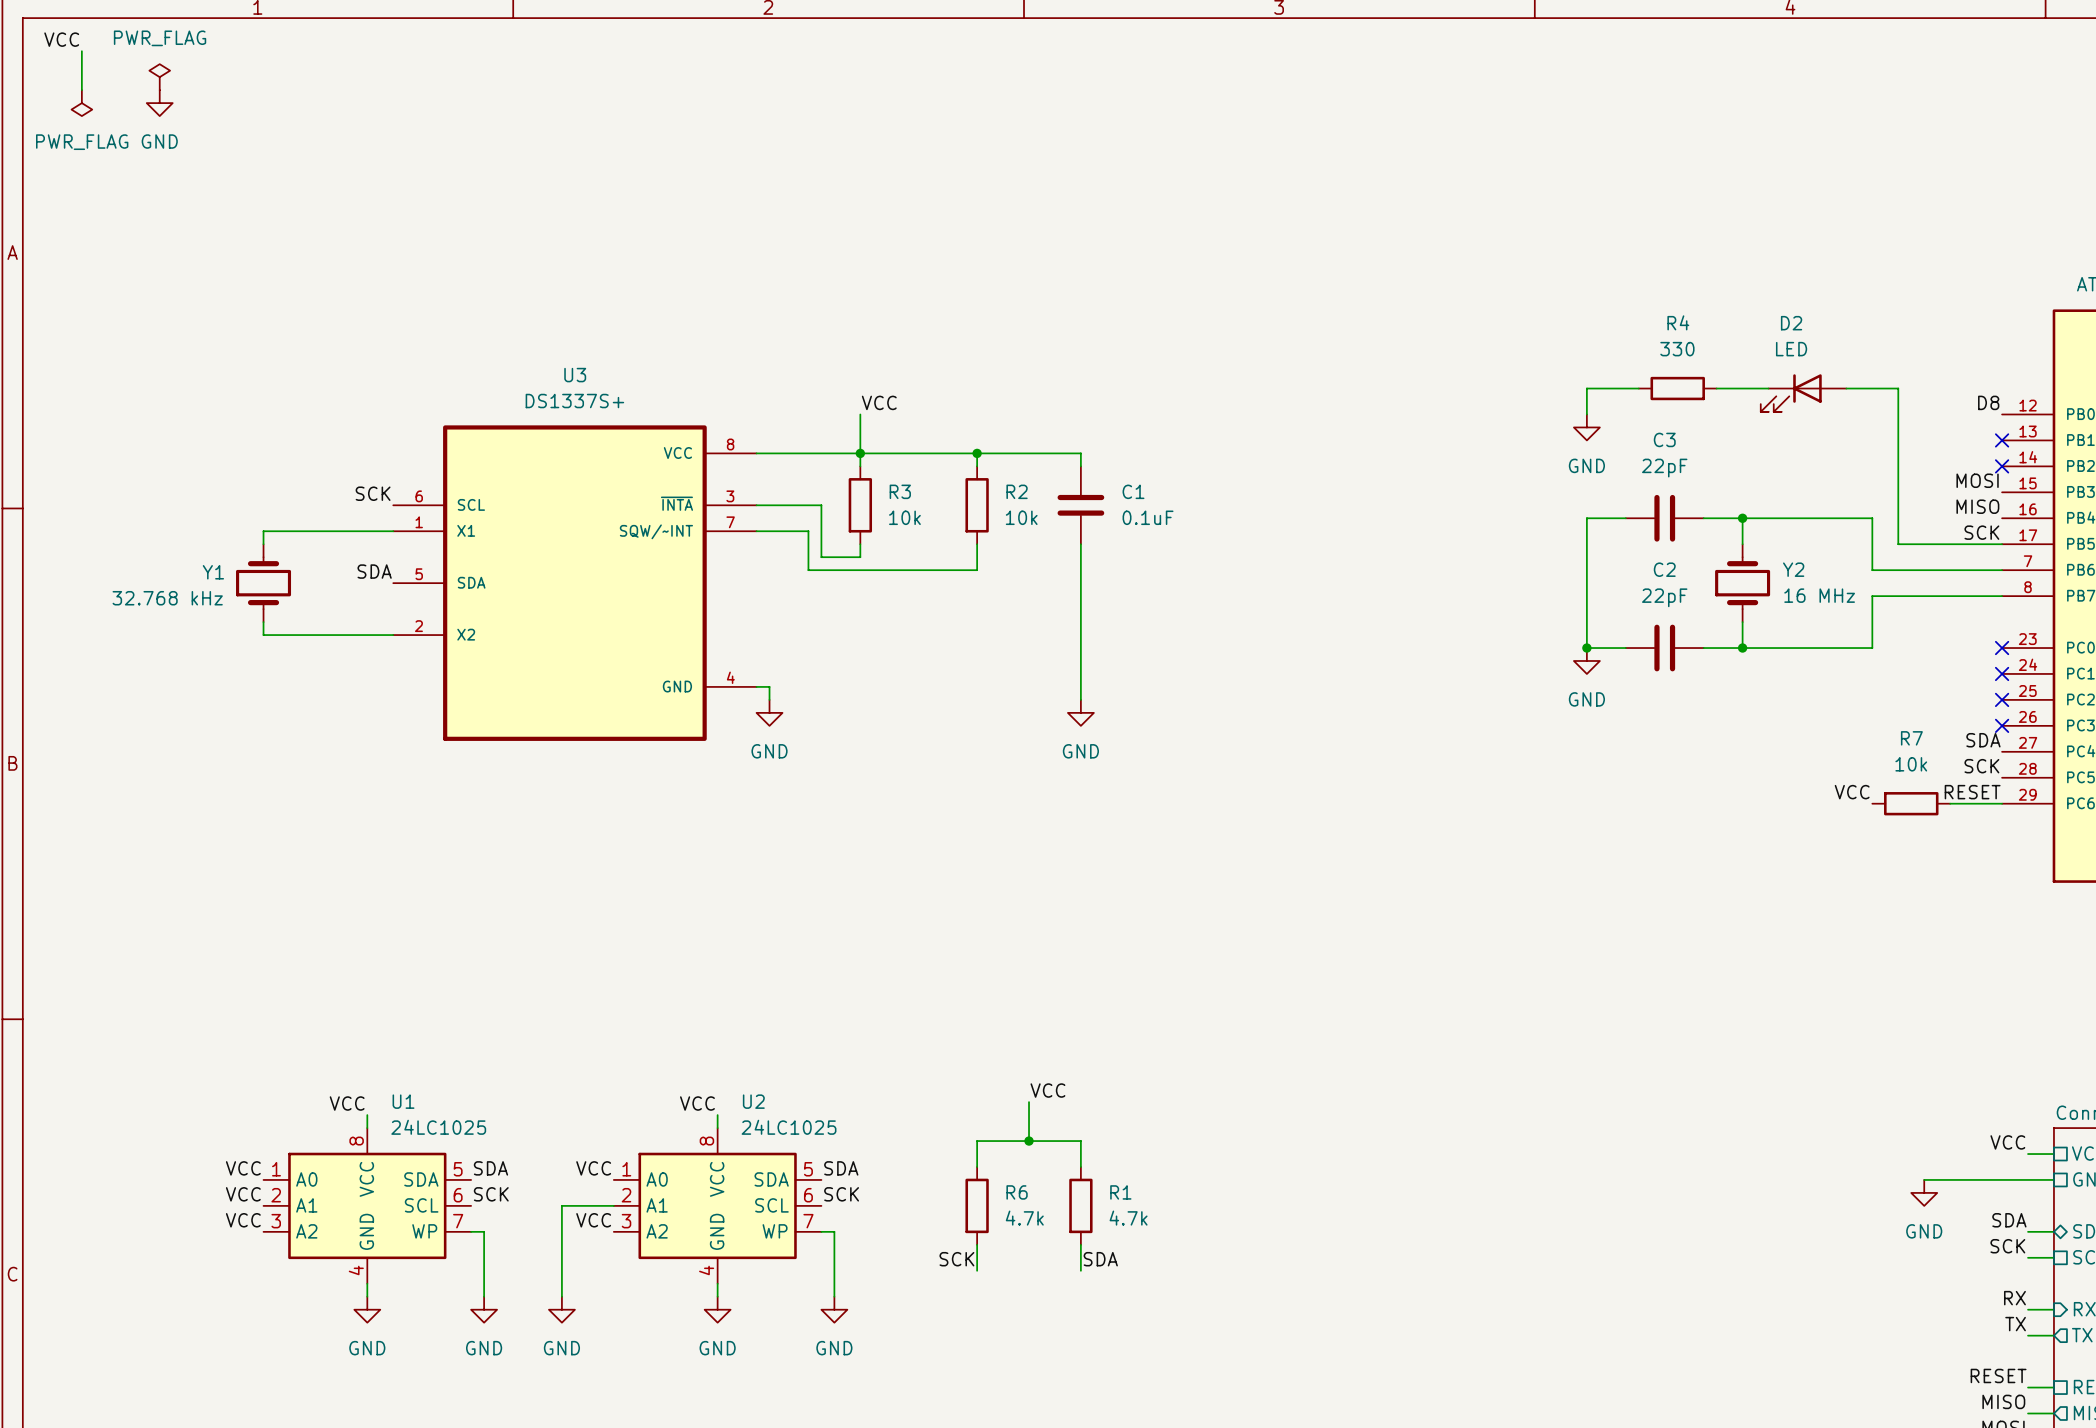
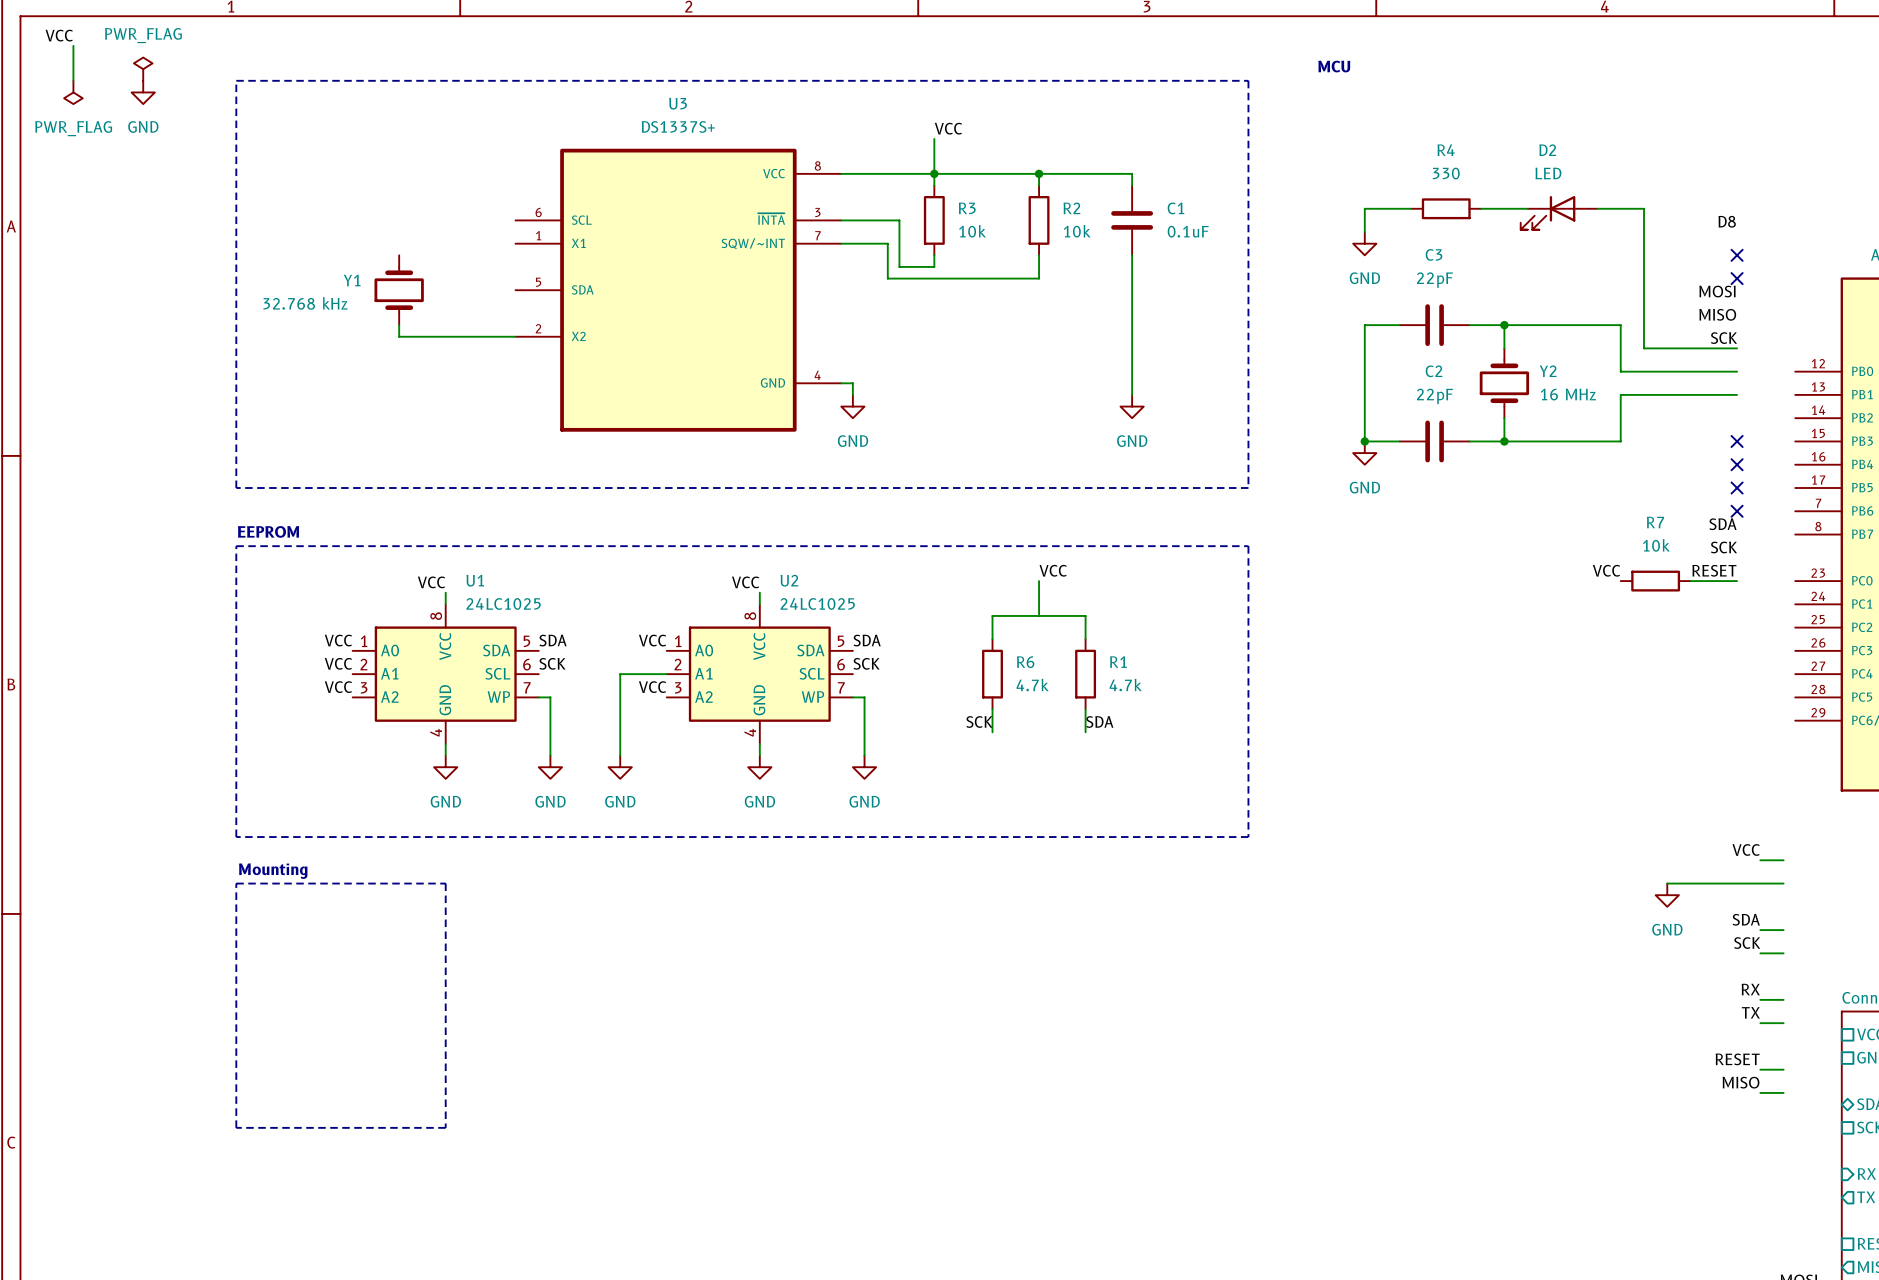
text: none -> MCU (1334, 66)
line: none -> (236, 80) (236, 488) (1248, 488) (1248, 80) (236, 80)
label: none -> VCC (948, 128)
wire: none -> (934, 138) (934, 185)
wire: none -> (841, 173) (1132, 173) (1132, 185)
junction: none -> (934, 173)
wire: none -> (1039, 173) (1039, 185)
junction: none -> (1039, 173)
wire: none -> (1597, 208) (1644, 208) (1644, 348) (1655, 348)
wire: none -> (841, 220) (899, 220) (899, 266) (934, 266) (934, 255)
wire: none -> (841, 243) (887, 243) (887, 278) (1039, 278) (1039, 255)
power symbol: none -> GND (1364, 243)
wire: none -> (1132, 255) (1132, 394)
no-connect mark: none -> (1737, 255)
no-connect mark: none -> (1737, 278)
wire: none -> (399, 325) (399, 336) (515, 336)
junction: none -> (1504, 325)
label: none -> SCK (1723, 338)
wire: (1638, 388) (1586, 388) (1586, 414) -> (1411, 208) (1364, 208) (1364, 232)
R4 position: (1677, 388) -> (1446, 208)
wire: (1716, 388) (1768, 388) -> (1481, 208) (1527, 208)
wire: (1898, 388) (1898, 544) (2002, 544) -> (1702, 348) (1737, 348)
D2 position: (1803, 393) -> (1559, 212)
label: VCC (879, 402) -> none
label position: D8 (1988, 402) -> D8 (1727, 221)
wire: none -> (841, 383) (852, 383) (852, 394)
power symbol: GND (1586, 427) -> none
no-connect mark: (2002, 440) -> none
wire: (756, 453) (1080, 453) (1080, 466) -> none
junction: (860, 453) -> none
power symbol: none -> GND (852, 406)
wire: (977, 453) (977, 466) -> (759, 592) (759, 604)
junction: (977, 453) -> none
power symbol: none -> GND (1132, 406)
no-connect mark: (2002, 466) -> none
label position: MOSI (1977, 480) -> MOSI (1717, 291)
junction: none -> (1364, 441)
junction: none -> (1504, 441)
no-connect mark: none -> (1737, 441)
label: SCK (373, 493) -> none
wire: (756, 505) (821, 505) (821, 557) (860, 557) (860, 544) -> none
R3 position: (860, 505) -> (934, 220)
R2 position: (977, 505) -> (1039, 220)
C1 position: (1080, 505) -> (1132, 220)
power symbol: none -> GND (1364, 453)
label position: MISO (1977, 506) -> MISO (1717, 314)
wire: (1625, 518) (1586, 518) (1586, 648) (1625, 648) -> (1399, 325) (1364, 325) (1364, 441) (1399, 441)
C3 position: (1664, 518) -> (1434, 325)
wire: (1703, 518) (1872, 518) (1872, 570) (2002, 570) -> (1469, 325) (1620, 325) (1620, 371) (1737, 371)
wire: (1742, 518) (1742, 544) -> (1504, 325) (1504, 348)
junction: (1742, 518) -> none
no-connect mark: none -> (1737, 464)
wire: (393, 531) (263, 531) (263, 544) -> none
wire: (756, 531) (808, 531) (808, 570) (977, 570) (977, 544) -> none
label: SCK (1981, 532) -> none
wire: (1080, 544) (1080, 699) -> none
no-connect mark: none -> (1737, 488)
no-connect mark: none -> (1737, 511)
label: SDA (374, 571) -> none
Y1 position: (263, 583) -> (399, 290)
U3 position: (574, 583) -> (678, 290)
Y2 position: (1742, 583) -> (1504, 383)
label: none -> SDA (1722, 524)
text: none -> EEPROM (268, 531)
wire: (2002, 596) (1872, 596) (1872, 648) (1703, 648) -> (1737, 394) (1620, 394) (1620, 441) (1469, 441)
line: none -> (236, 546) (236, 837) (1248, 837) (1248, 546) (236, 546)
label: none -> SCK (1723, 547)
wire: (263, 622) (263, 635) (393, 635) -> none
wire: (1742, 622) (1742, 648) -> (1504, 418) (1504, 441)
label: none -> VCC (1053, 570)
label: none -> VCC (1606, 570)
wire: none -> (1039, 581) (1039, 615)
junction: (1586, 648) -> none
C2 position: (1664, 648) -> (1434, 441)
junction: (1742, 648) -> none
no-connect mark: (2002, 648) -> none
label: none -> VCC (431, 582)
label: none -> VCC (745, 582)
power symbol: GND (1586, 660) -> none
no-connect mark: (2002, 673) -> none
wire: (756, 686) (769, 686) (769, 699) -> none
no-connect mark: (2002, 699) -> none
power symbol: GND (769, 712) -> none
power symbol: GND (1080, 712) -> none
wire: none -> (992, 639) (992, 615) (1085, 615) (1085, 639)
label: none -> VCC (338, 640)
label: none -> SDA (553, 640)
label: none -> VCC (652, 640)
label: none -> SDA (867, 640)
no-connect mark: (2002, 725) -> none
label: none -> VCC (338, 663)
label: none -> SCK (552, 663)
label: none -> SCK (866, 663)
label: SDA (1983, 740) -> none
wire: none -> (666, 674) (620, 674) (620, 755)
label: none -> VCC (338, 687)
label: none -> VCC (652, 687)
label: SCK (1981, 766) -> none
wire: none -> (538, 697) (550, 697) (550, 755)
wire: none -> (852, 697) (864, 697) (864, 755)
wire: none -> (992, 709) (992, 732)
wire: none -> (1085, 709) (1085, 732)
label: VCC (1852, 792) -> none
label position: RESET (1972, 792) -> RESET (1714, 570)
R7 position: (1911, 803) -> (1655, 581)
wire: (1950, 803) (2002, 803) -> (1690, 581) (1737, 581)
label: none -> SCK (979, 721)
label: none -> SDA (1099, 721)
wire: none -> (445, 743) (445, 755)
wire: none -> (759, 743) (759, 755)
power symbol: none -> GND (445, 767)
power symbol: none -> GND (550, 767)
power symbol: none -> GND (620, 767)
power symbol: none -> GND (759, 767)
power symbol: none -> GND (864, 767)
label: none -> VCC (1746, 849)
text: none -> Mounting (273, 871)
line: none -> (236, 883) (445, 883) (445, 1127) (236, 1127) (236, 883)
label: none -> SDA (1746, 919)
label: none -> SCK (1747, 943)
label: VCC (1047, 1090) -> none
wire: (1029, 1102) (1029, 1141) -> none
label: VCC (347, 1103) -> none
label: VCC (697, 1103) -> none
wire: (367, 1115) (367, 1128) -> none
wire: (717, 1115) (717, 1128) -> none
junction: (1029, 1141) -> none
label: VCC (2007, 1142) -> none
wire: (2028, 1154) (2053, 1154) -> (1760, 860) (1783, 860)
wire: (977, 1166) (977, 1141) (1080, 1141) (1080, 1166) -> none
label: VCC (243, 1168) -> none
label: SDA (490, 1168) -> none
label: VCC (593, 1168) -> none
label: SDA (841, 1168) -> none
wire: (1924, 1179) (2053, 1179) -> (1667, 883) (1783, 883)
label: none -> RESET (1737, 1059)
power symbol position: GND (1924, 1192) -> GND (1667, 895)
label: VCC (243, 1194) -> none
label: SCK (491, 1194) -> none
label: SCK (841, 1194) -> none
U1 position: (367, 1205) -> (445, 674)
wire: (613, 1205) (561, 1205) (561, 1296) -> none
U2 position: (717, 1205) -> (759, 674)
R6 position: (977, 1205) -> (992, 674)
R1 position: (1080, 1205) -> (1085, 674)
label: VCC (243, 1220) -> none
label: VCC (593, 1220) -> none
label: SDA (2009, 1220) -> none
wire: (471, 1231) (484, 1231) (484, 1296) -> none
wire: (821, 1231) (834, 1231) (834, 1296) -> none
wire: (2028, 1231) (2053, 1231) -> (1760, 930) (1783, 930)
wire: (977, 1244) (977, 1270) -> none
wire: (1080, 1244) (1080, 1270) -> none
label: SCK (2007, 1246) -> none
wire: (2028, 1257) (2053, 1257) -> (1760, 953) (1783, 953)
label: SCK (956, 1259) -> none
label: SDA (1100, 1259) -> none
wire: (367, 1283) (367, 1296) -> none
wire: (717, 1283) (717, 1296) -> none
label position: RX (2014, 1298) -> RX (1750, 989)
power symbol: GND (367, 1309) -> none
power symbol: GND (484, 1309) -> none
power symbol: GND (561, 1309) -> none
power symbol: GND (717, 1309) -> none
power symbol: GND (834, 1309) -> none
wire: (2028, 1309) (2053, 1309) -> (1760, 999) (1783, 999)
label position: TX (2015, 1324) -> TX (1750, 1012)
wire: (2028, 1335) (2053, 1335) -> (1760, 1023) (1783, 1023)
label: RESET (1998, 1375) -> none
wire: (2028, 1387) (2053, 1387) -> (1760, 1069) (1783, 1069)
label position: MISO (2003, 1401) -> MISO (1741, 1082)
wire: (2028, 1413) (2053, 1413) -> (1760, 1092) (1783, 1092)

